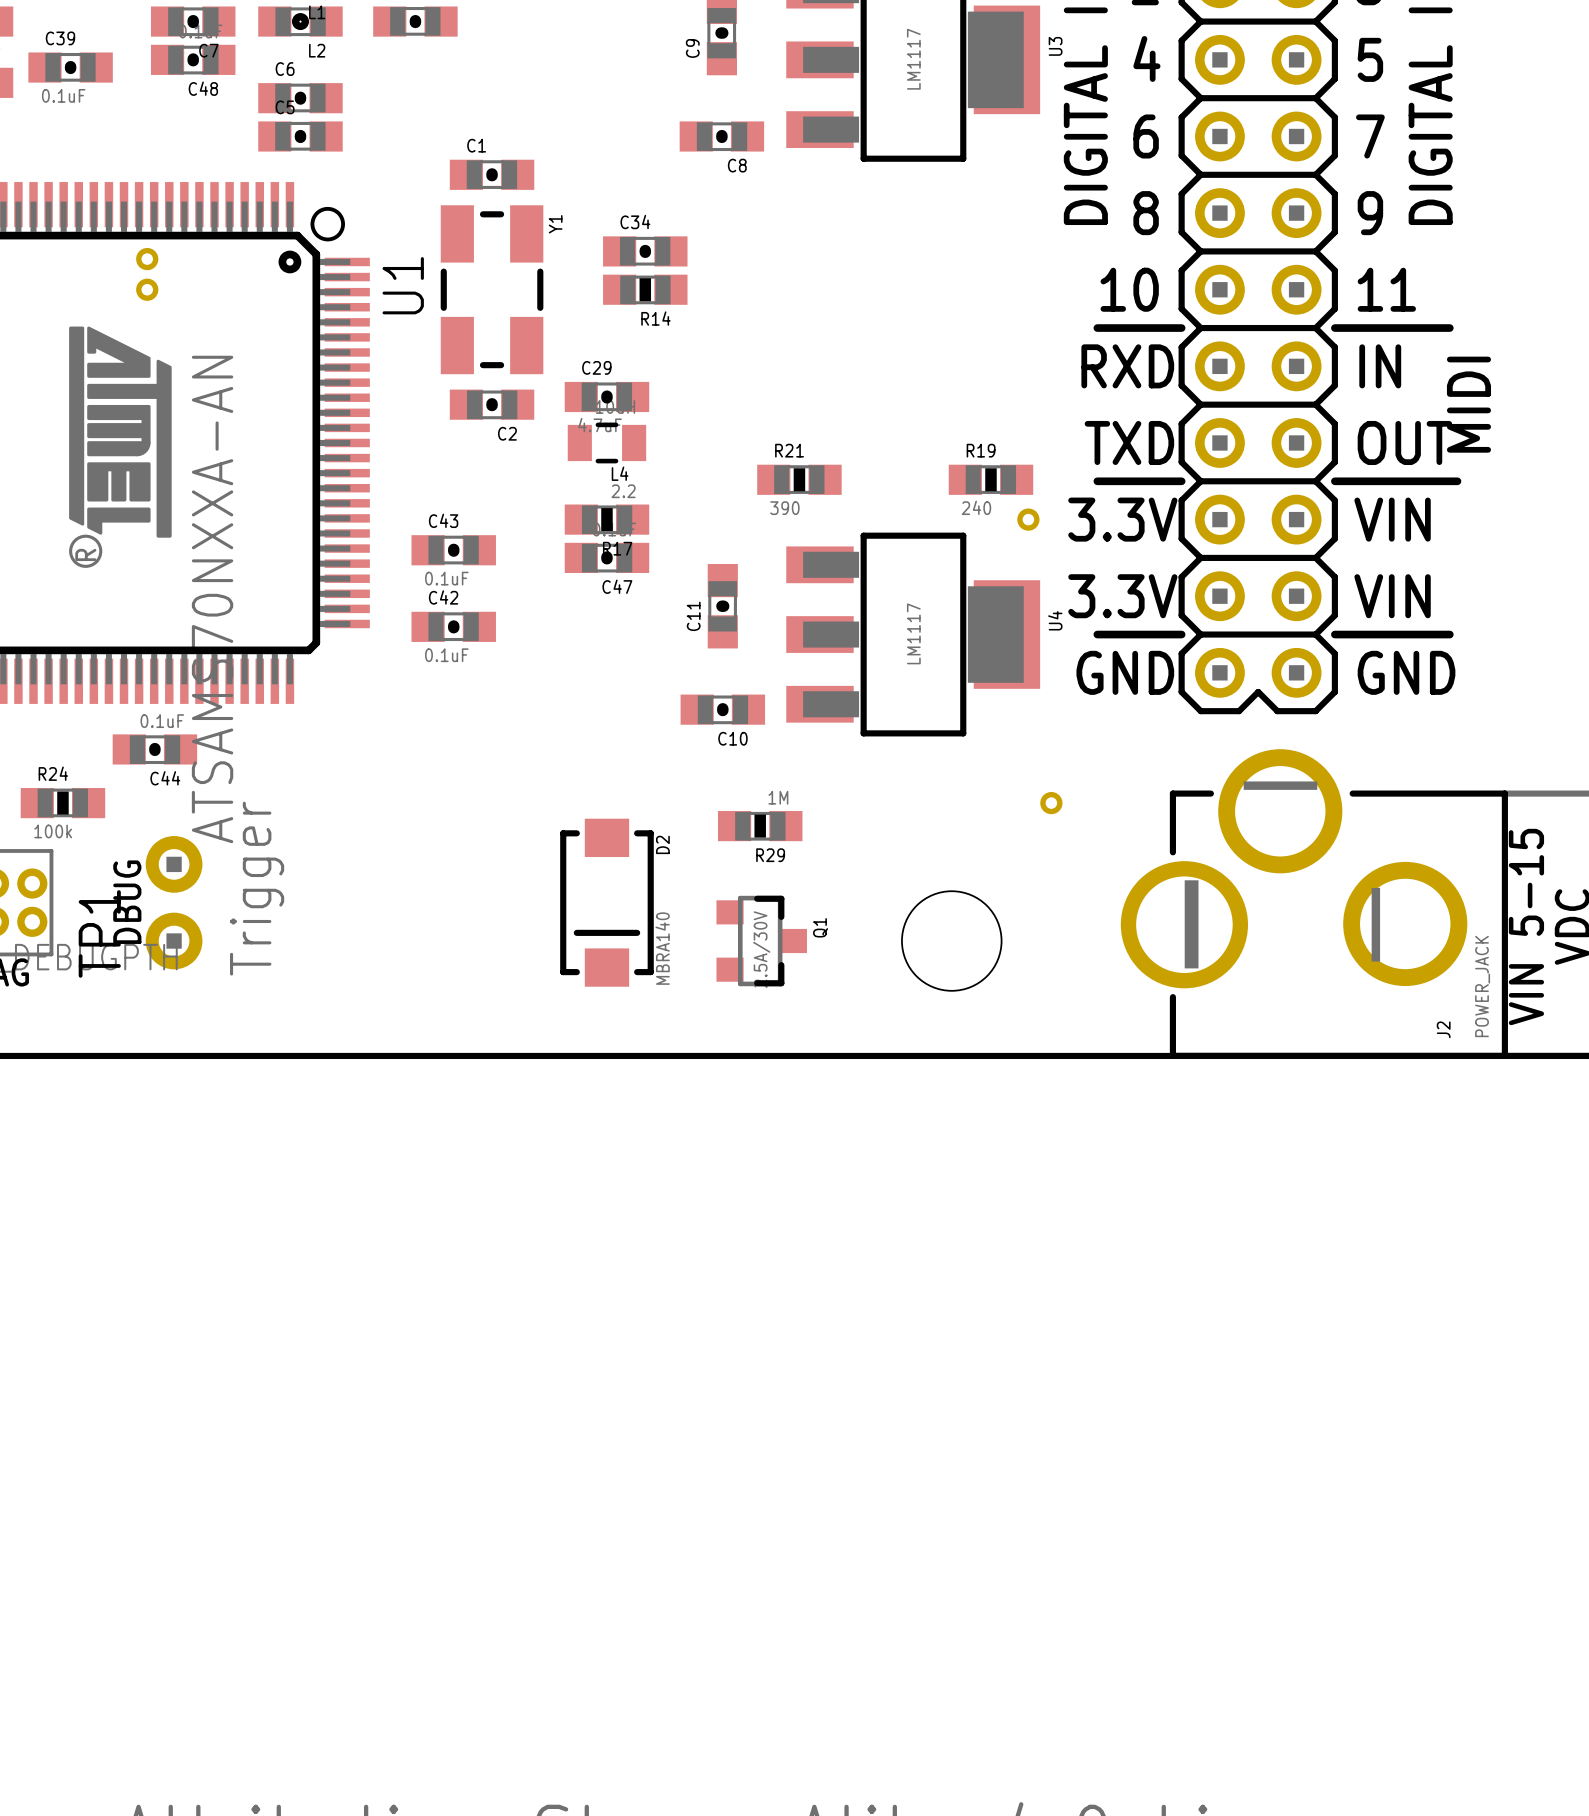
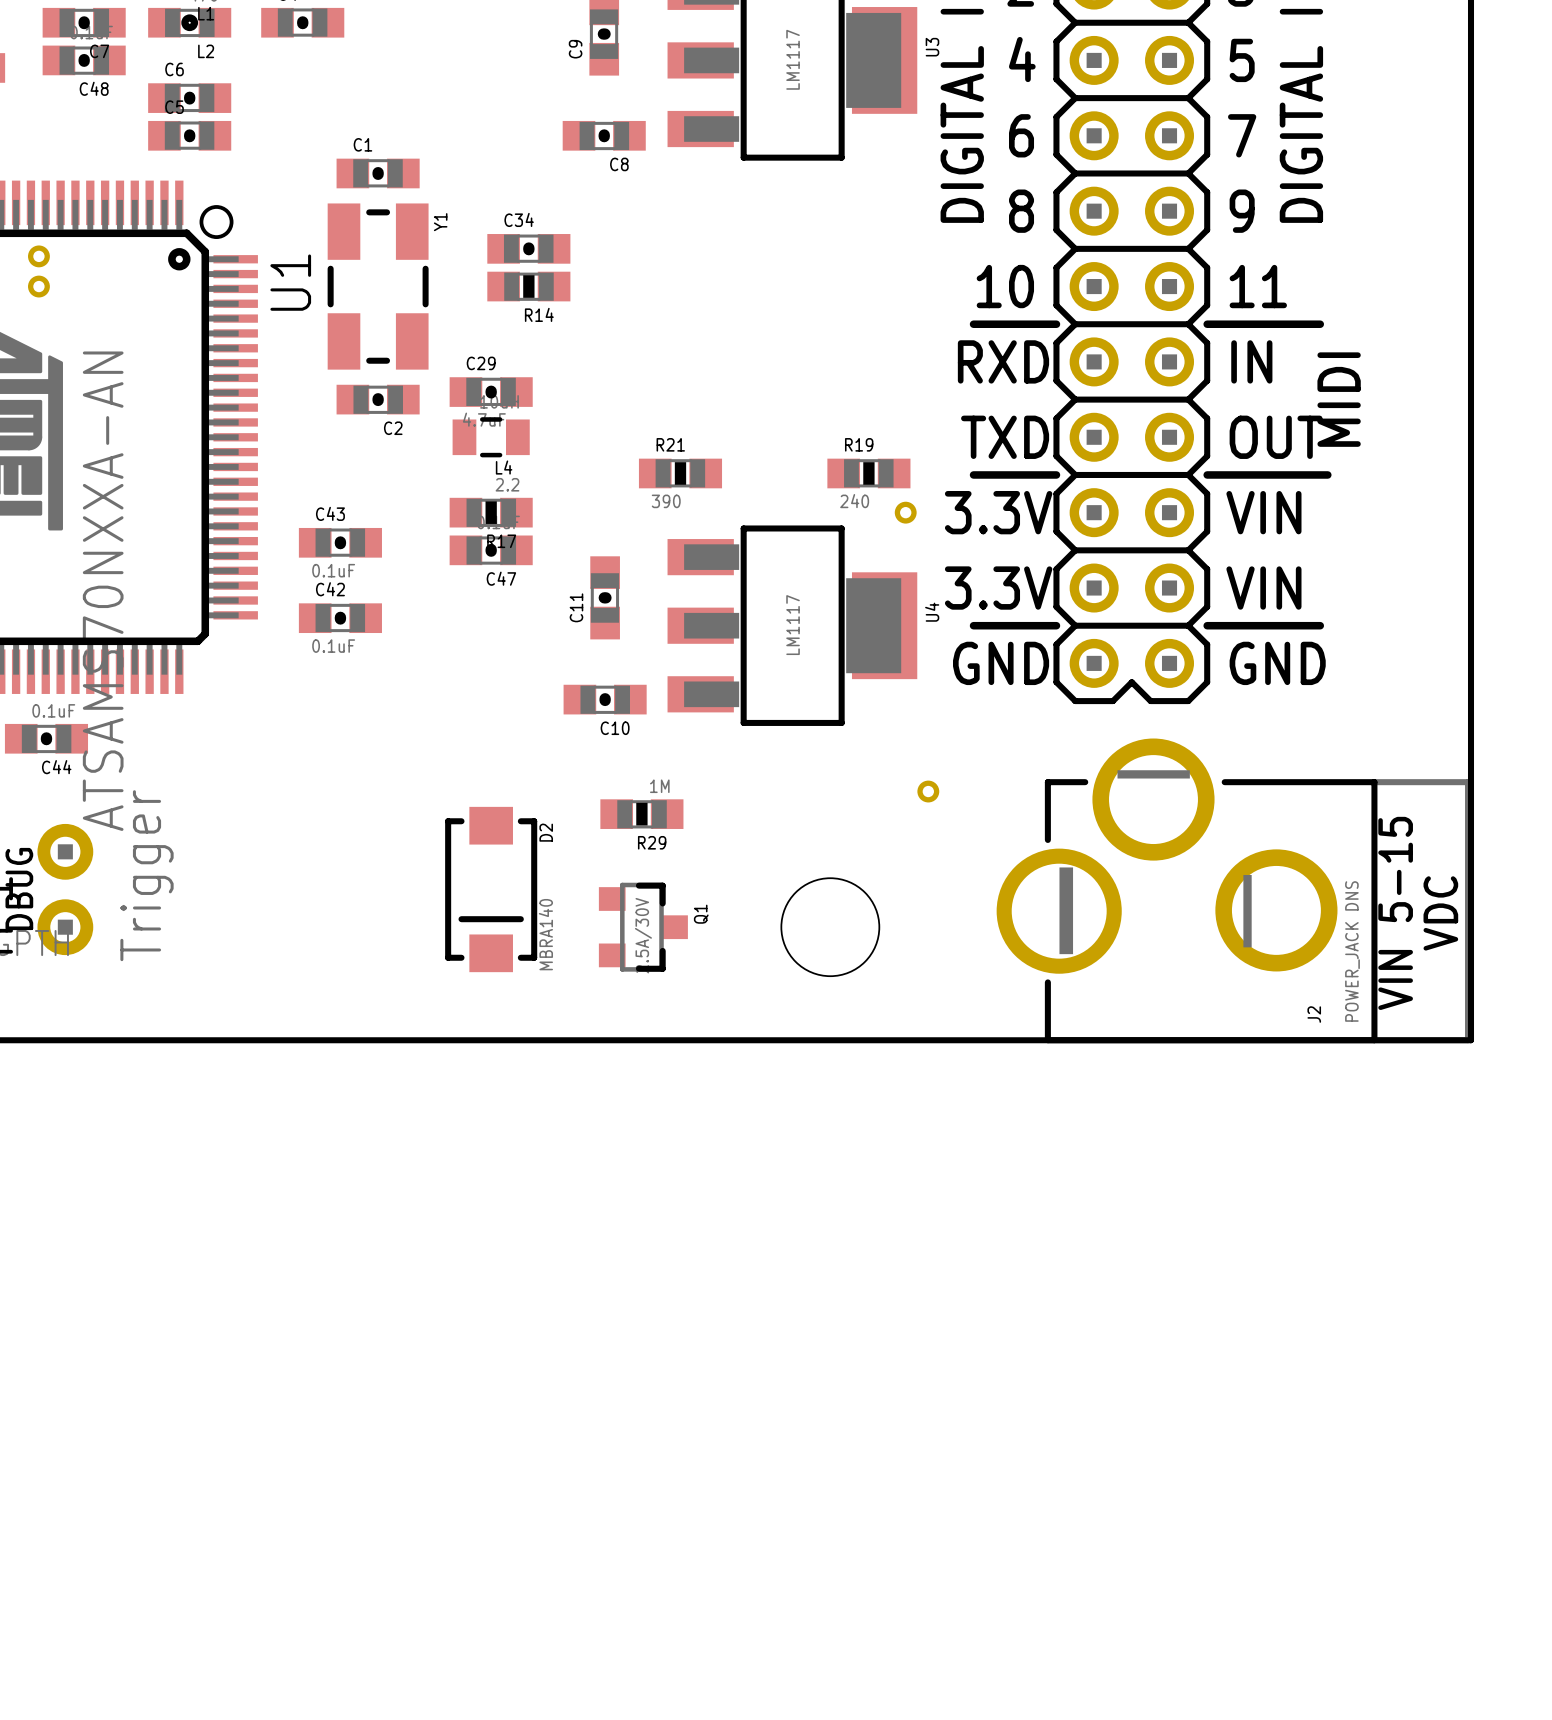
J2 value: POWER_JACK (1482, 986) -> POWER_JACK DNS (1352, 951)

